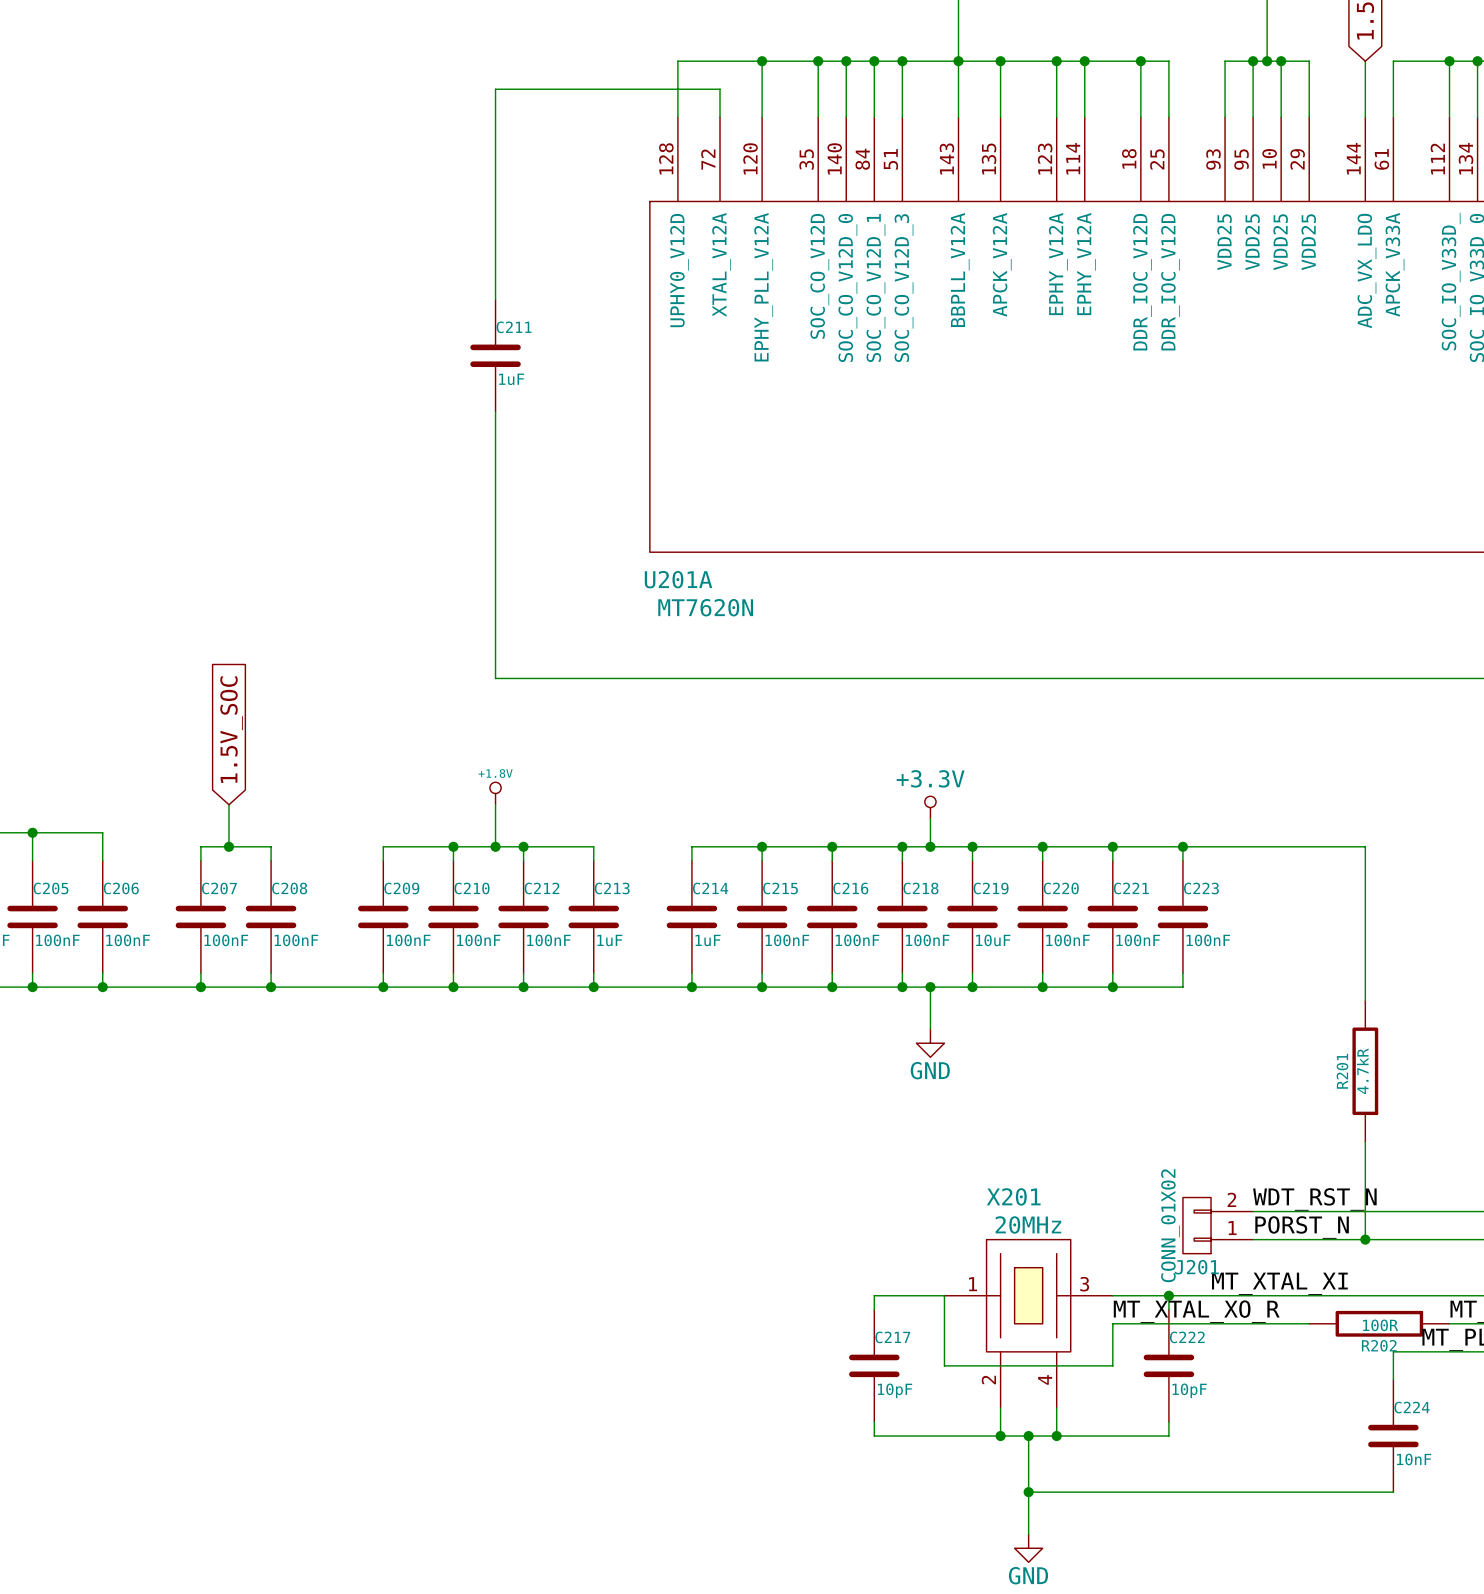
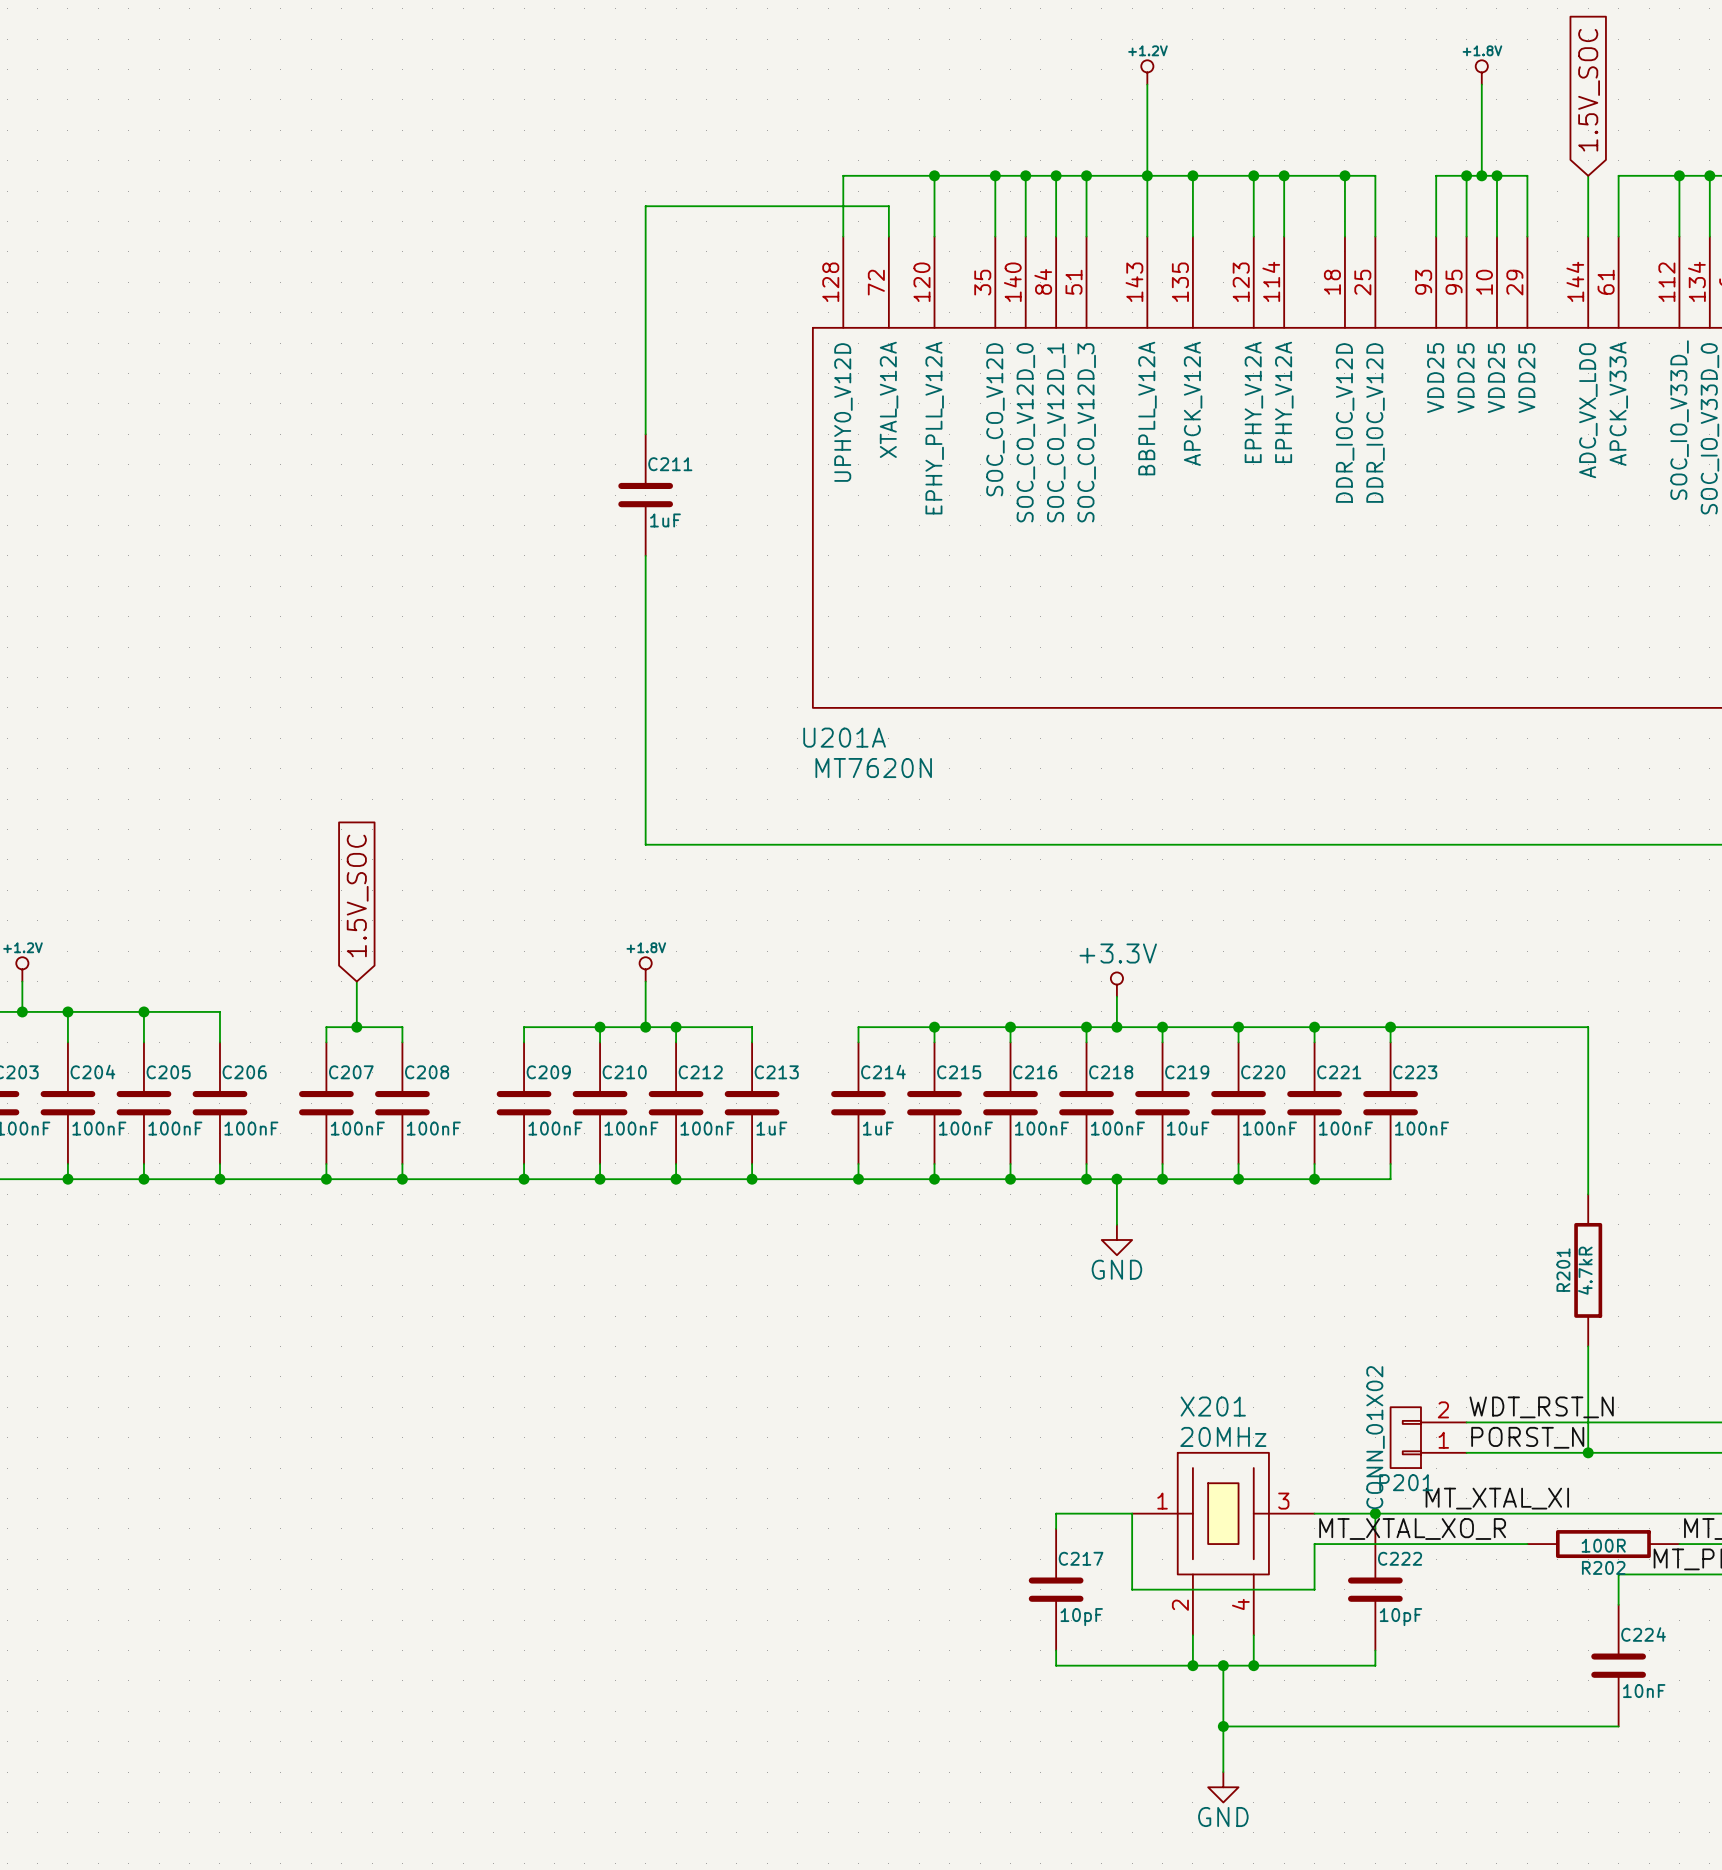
J201 name: J201 (1196, 1267) -> P201 (1406, 1482)

